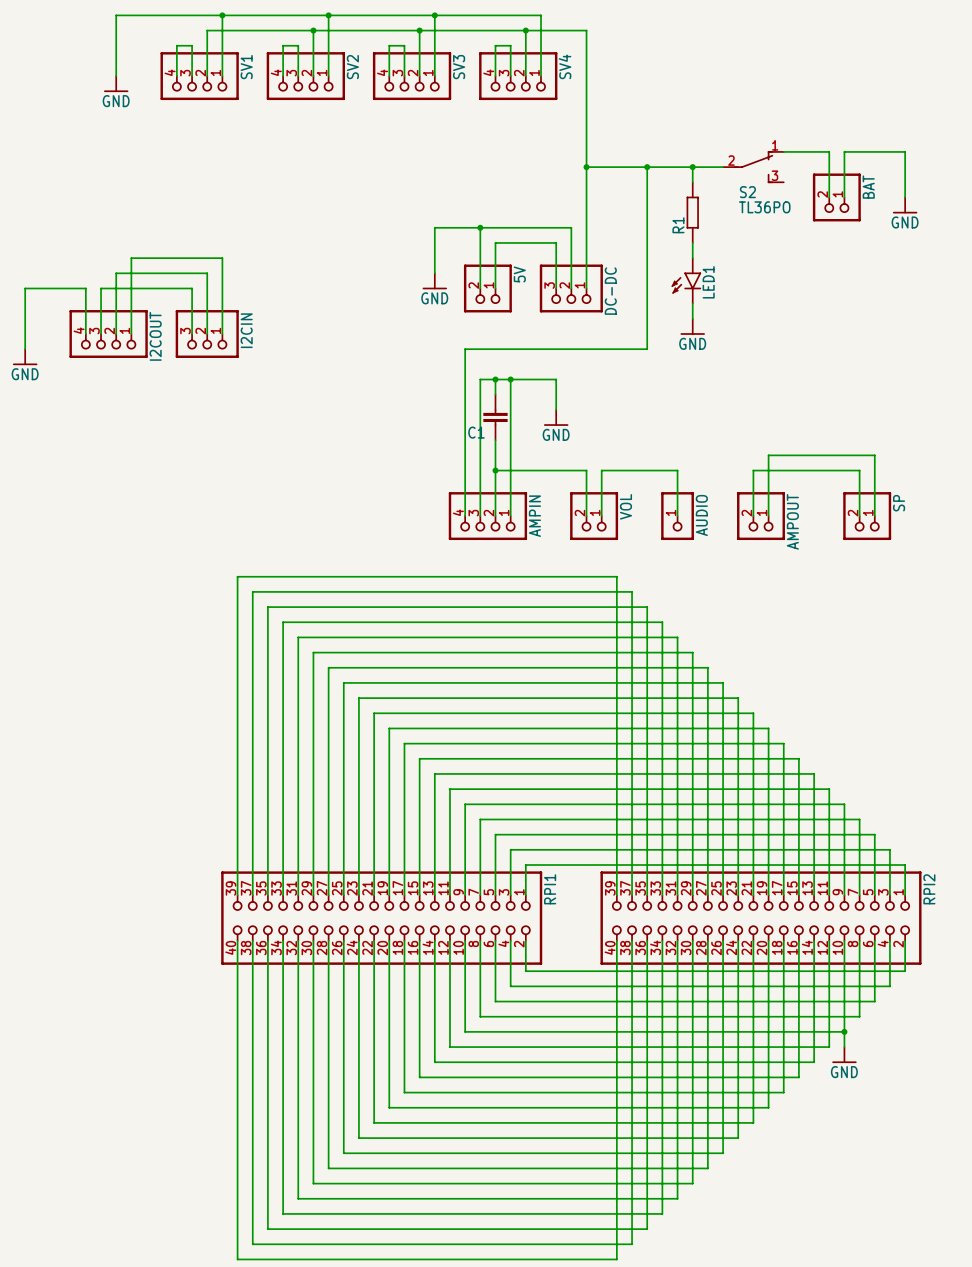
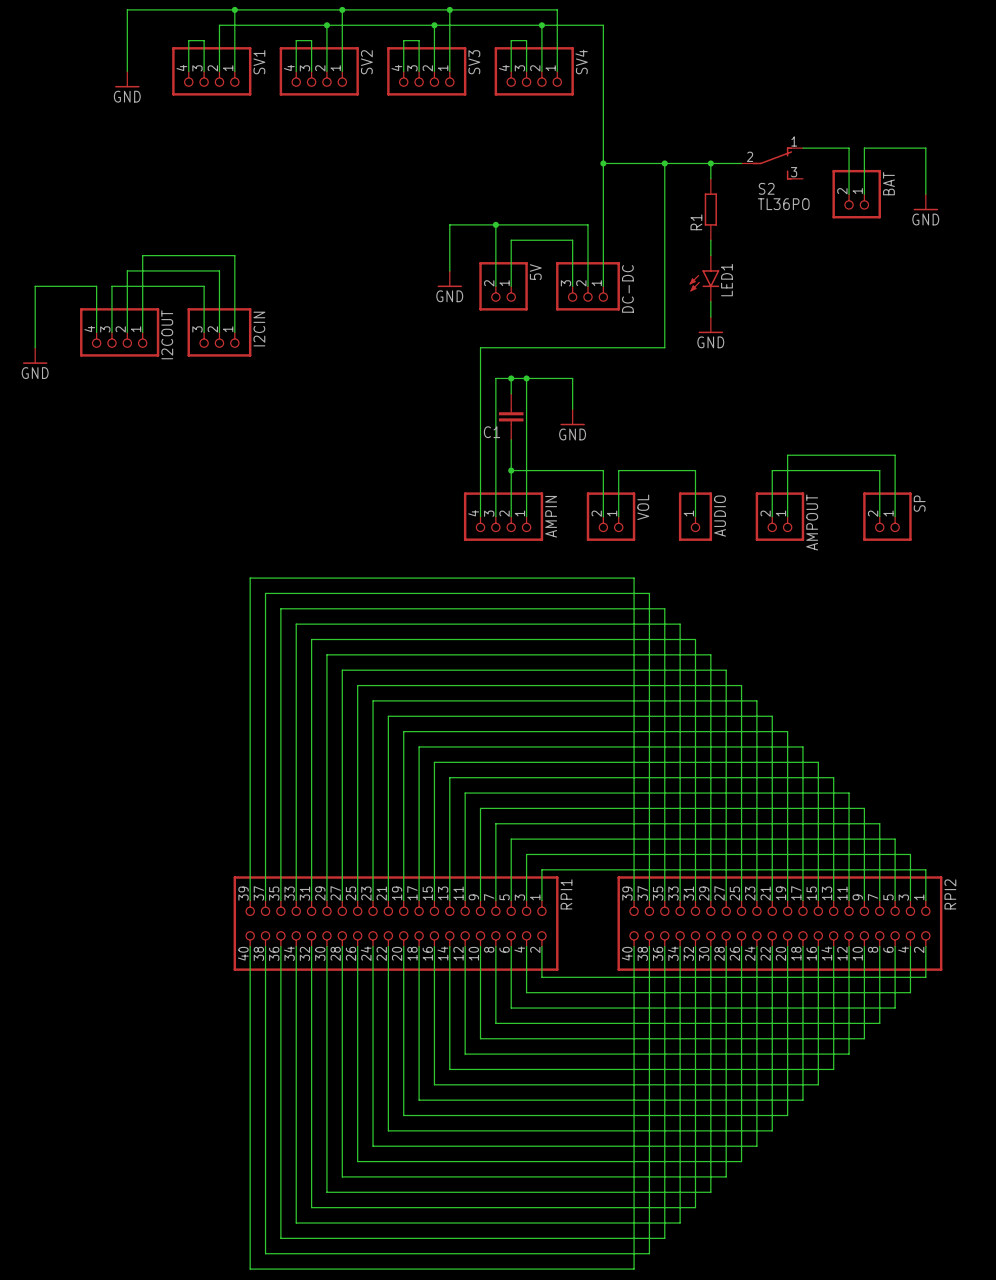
wire: (844, 1031) (844, 1047) -> none
junction: (844, 1031) -> none
power symbol: GND (844, 1055) -> none

